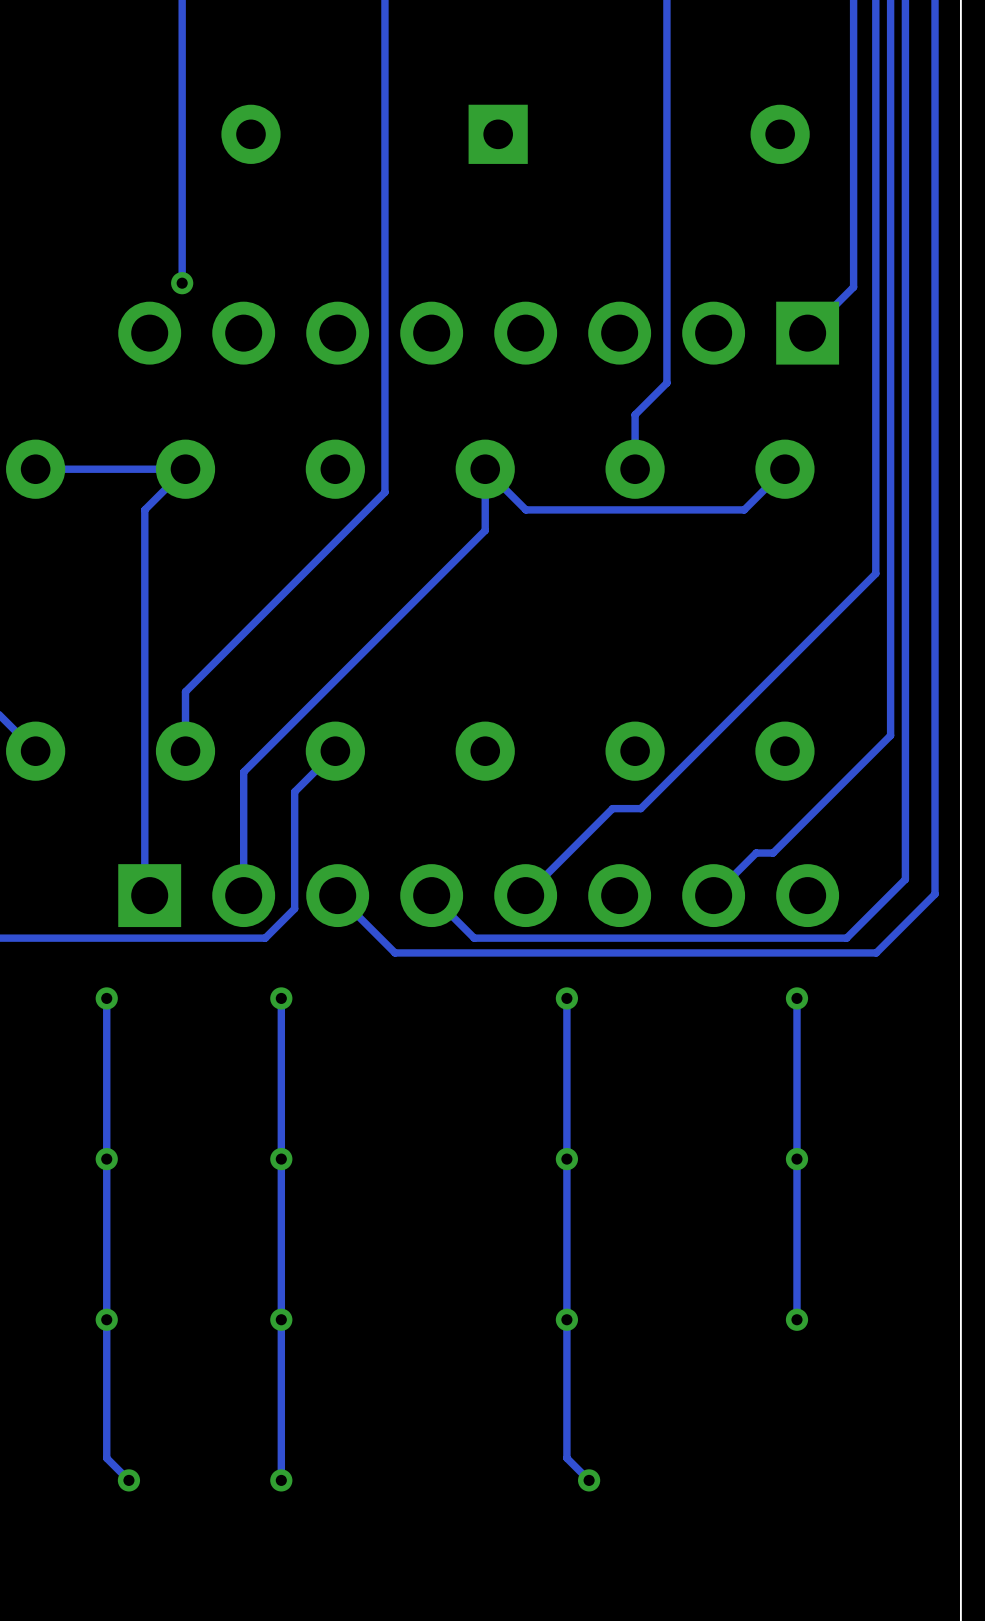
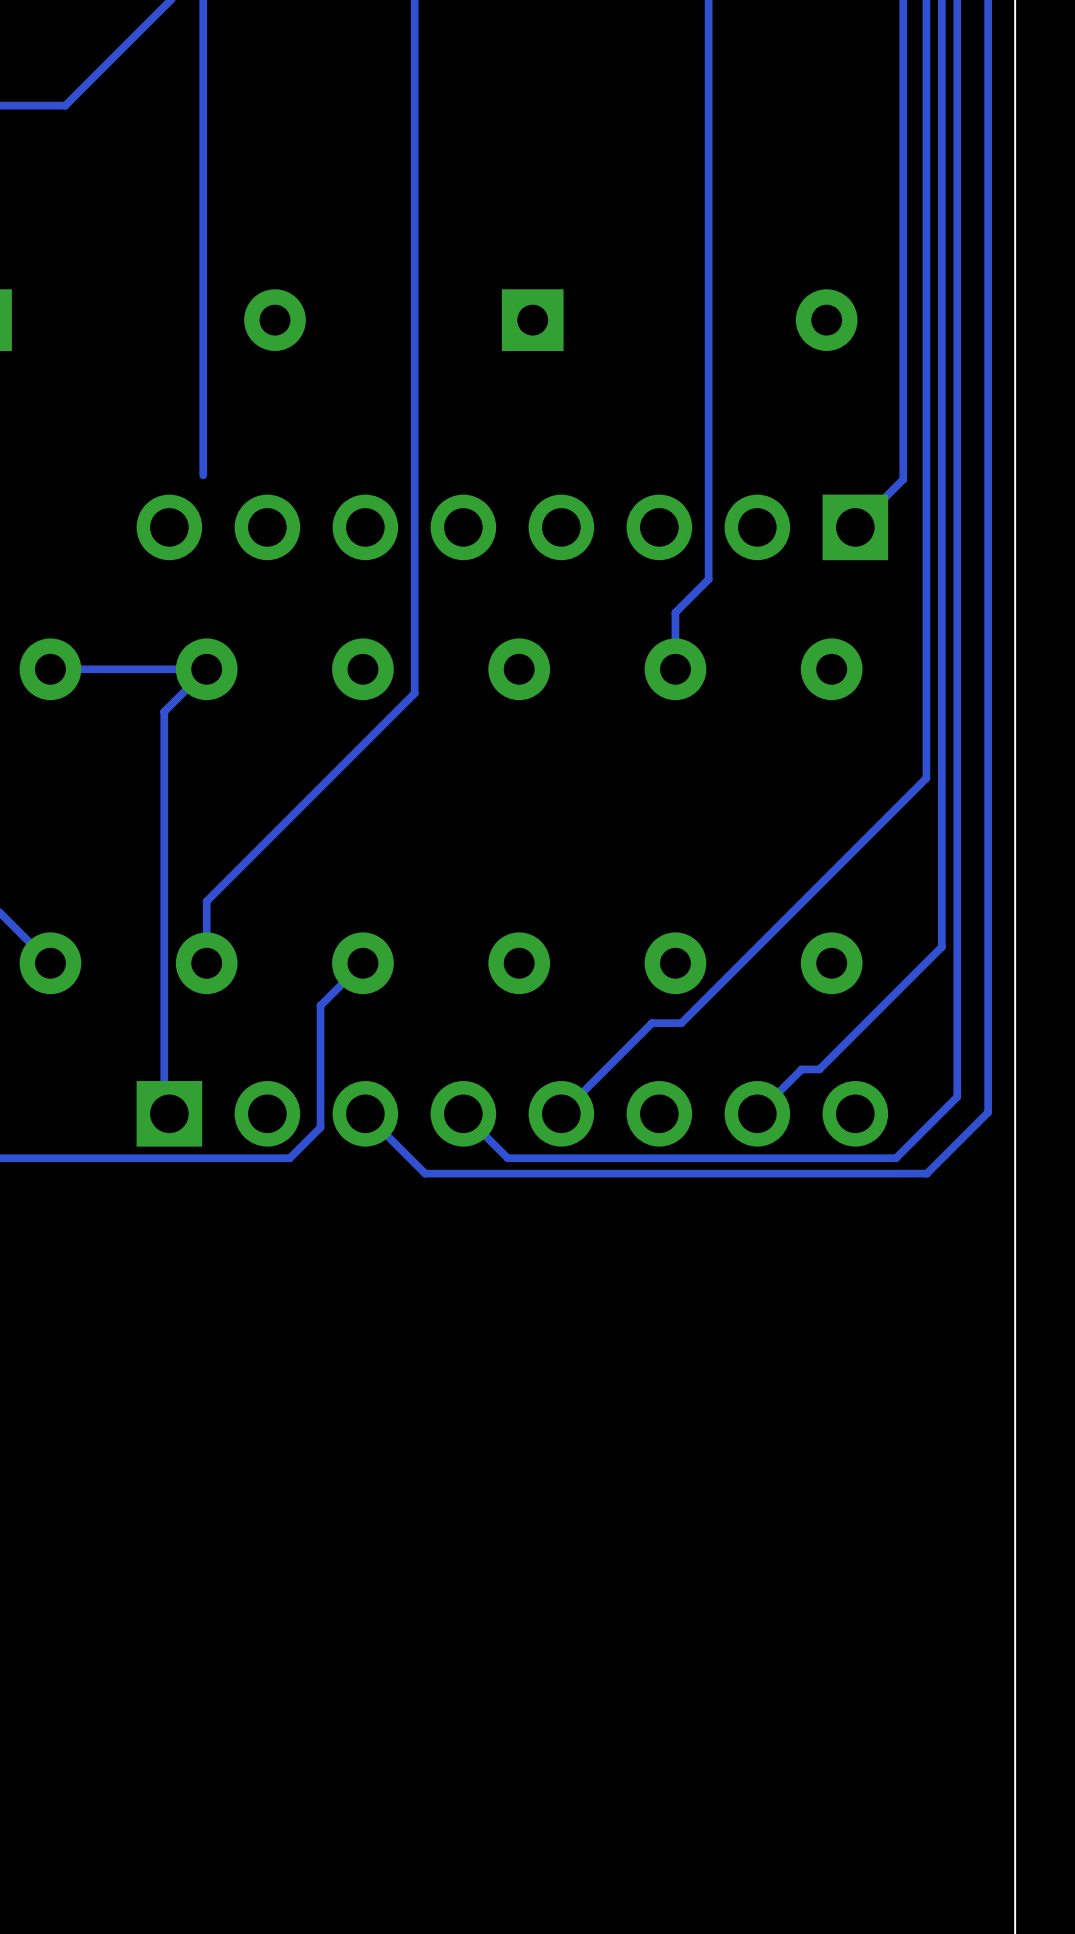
via: (182, 283) -> none
track: (784, 469) (744, 509) (525, 509) (485, 469) (485, 530) (243, 772) (243, 895) -> none
track: (106, 998) (106, 1458) (128, 1480) -> none
via: (106, 998) -> none
track: (281, 998) (281, 1480) -> none
via: (281, 998) -> none
track: (566, 998) (566, 1458) (589, 1480) -> none
via: (566, 998) -> none
track: (796, 998) (796, 1319) -> none
via: (796, 998) -> none
via: (106, 1159) -> none
via: (281, 1159) -> none
via: (566, 1159) -> none
via: (796, 1159) -> none
via: (106, 1319) -> none
via: (281, 1319) -> none
via: (566, 1319) -> none
via: (796, 1319) -> none
via: (128, 1480) -> none
via: (281, 1480) -> none
via: (589, 1480) -> none

